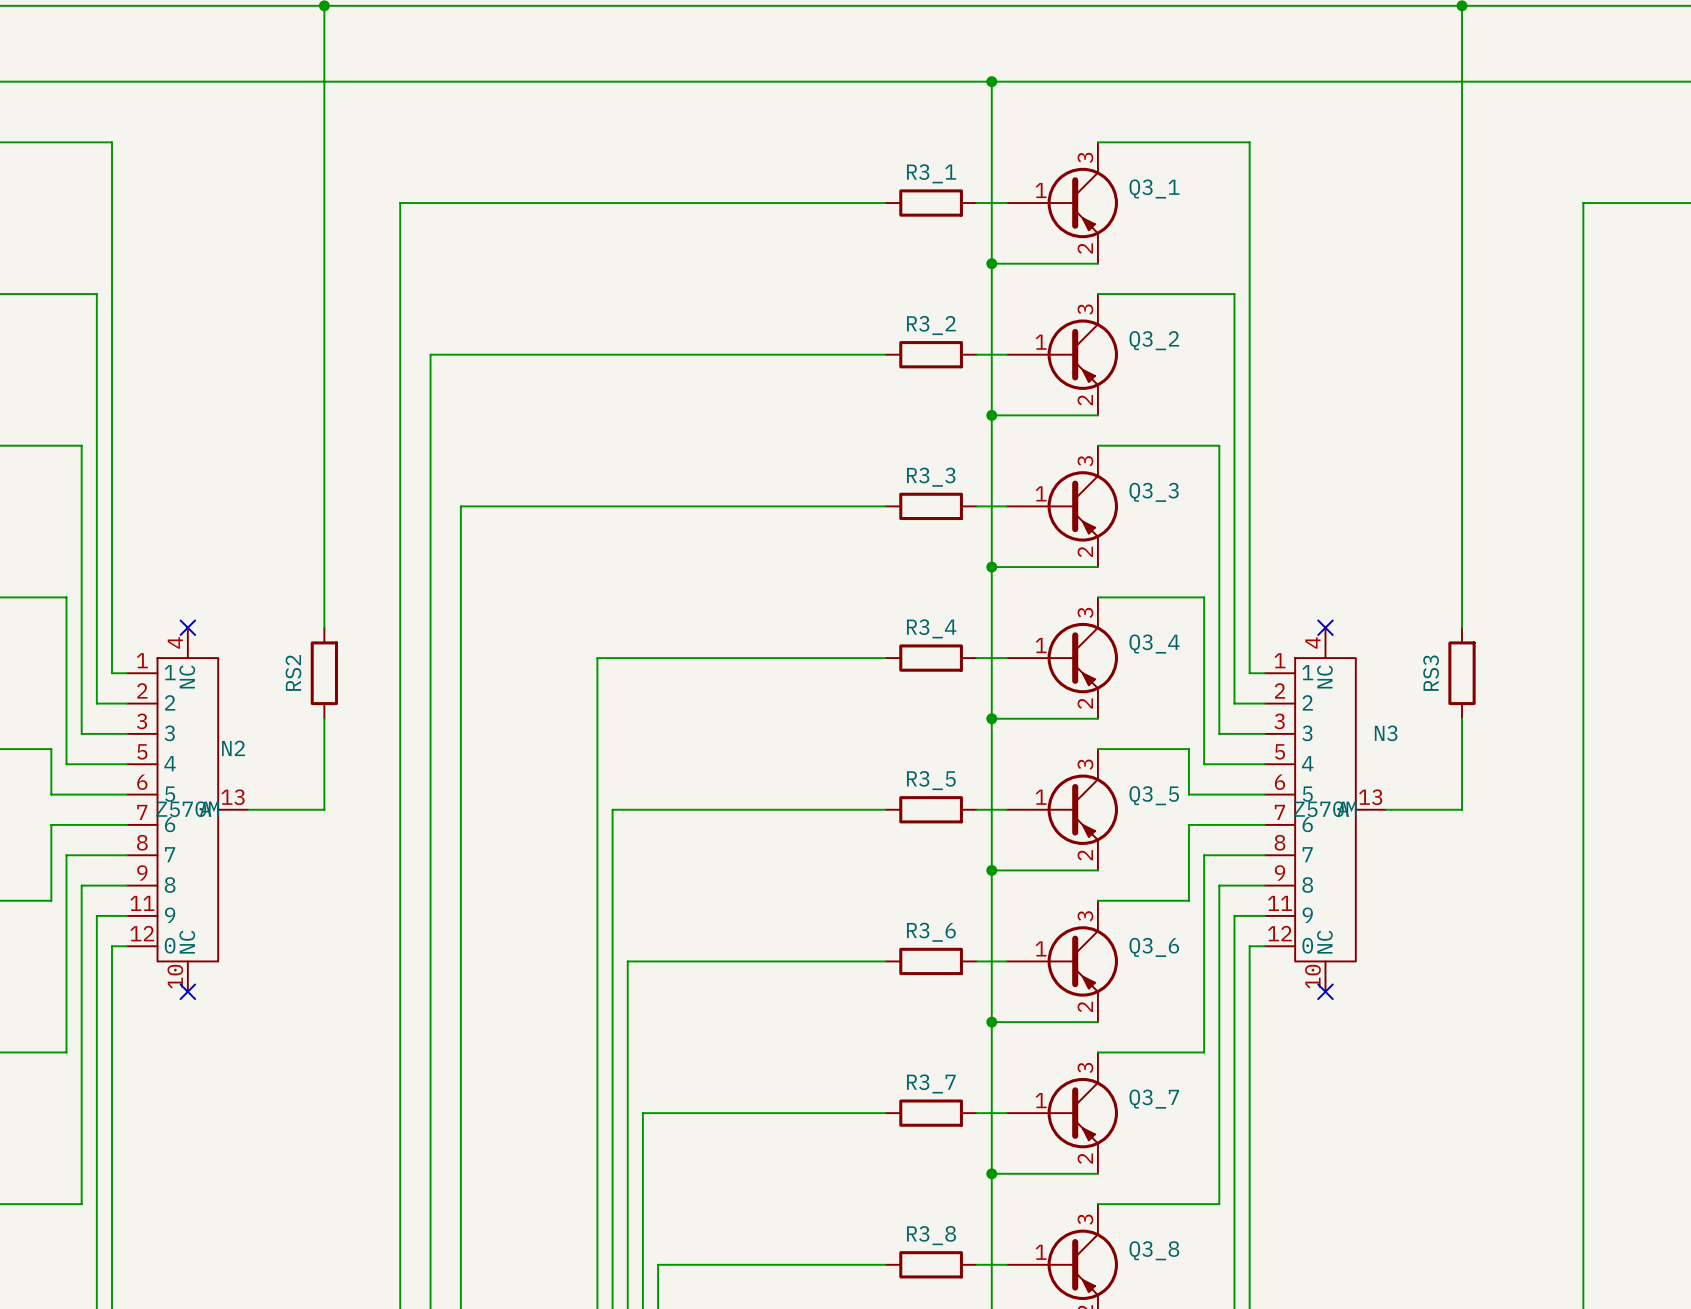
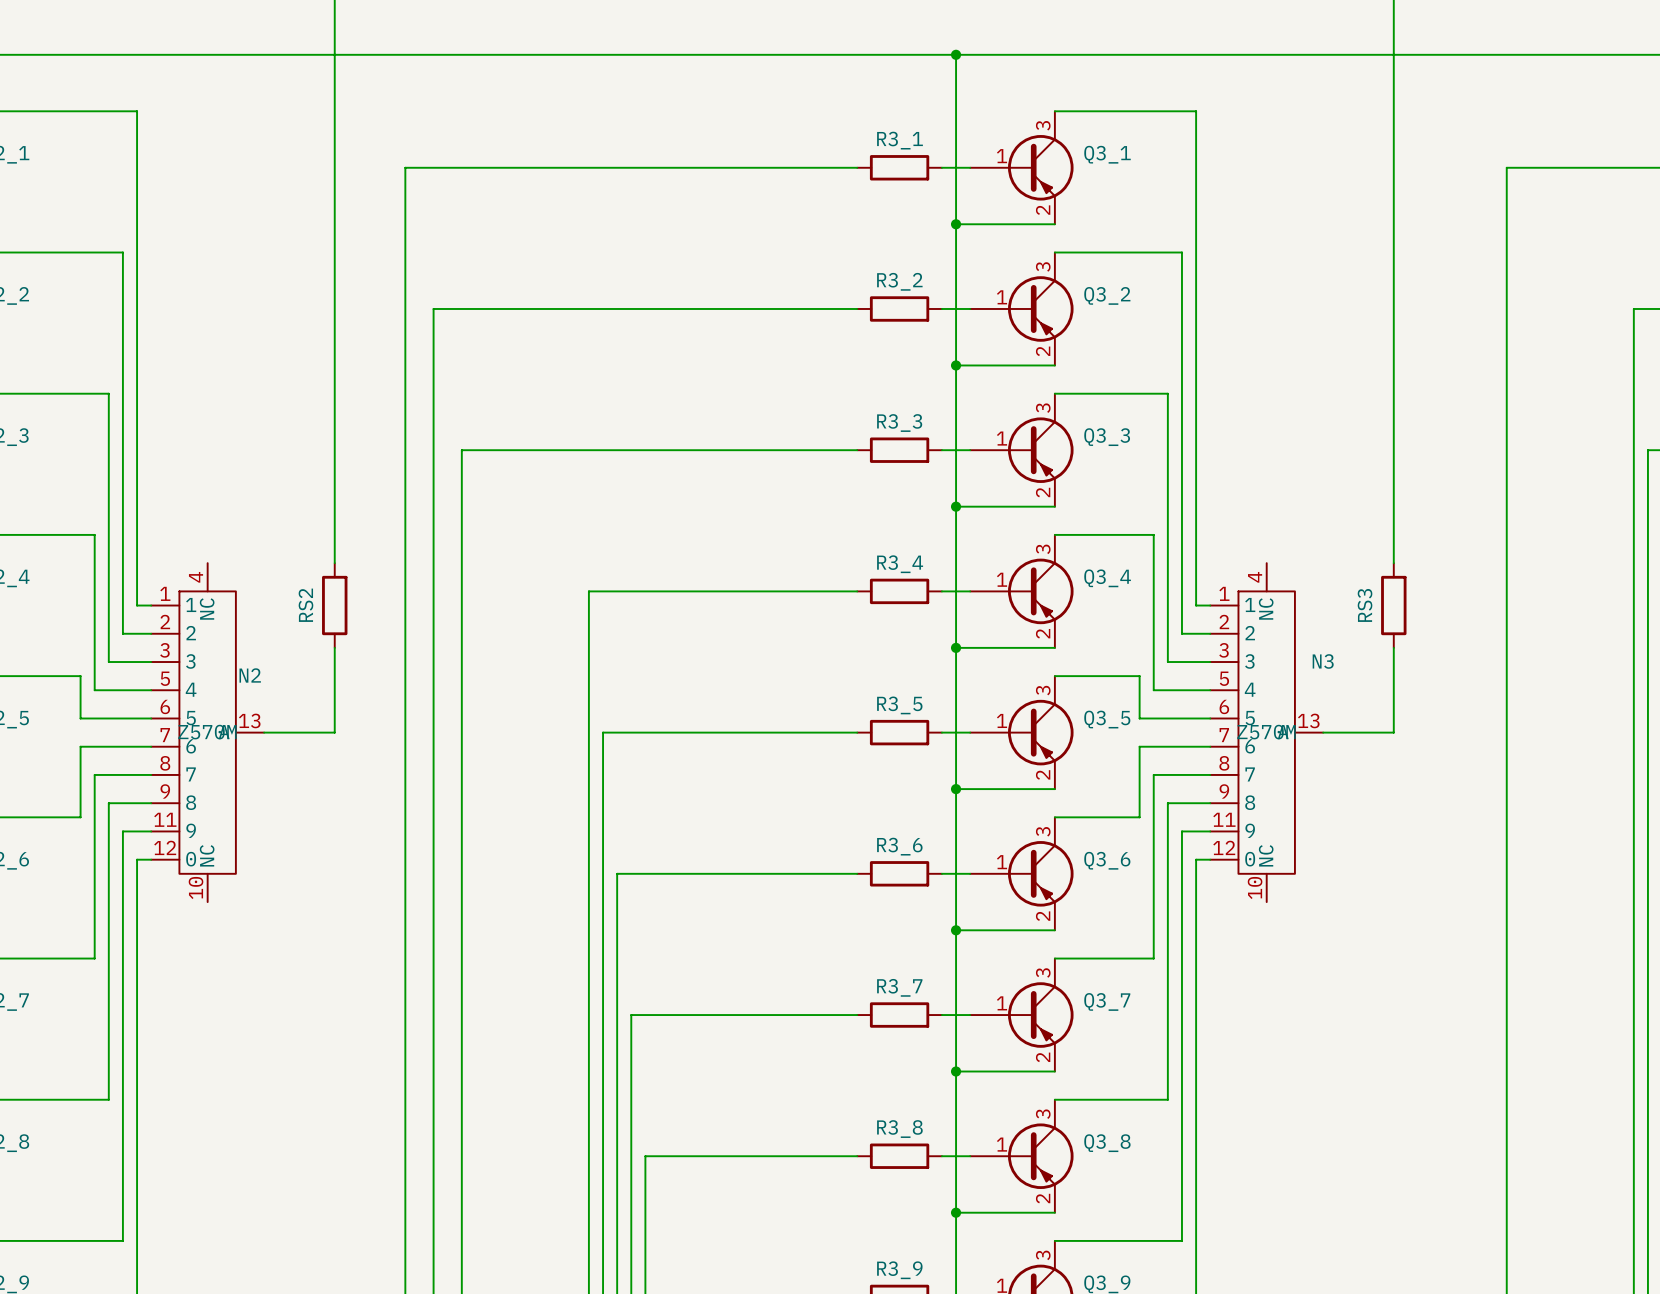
no-connect mark: (187, 627) -> none
no-connect mark: (1325, 627) -> none
no-connect mark: (187, 991) -> none
no-connect mark: (1325, 991) -> none

